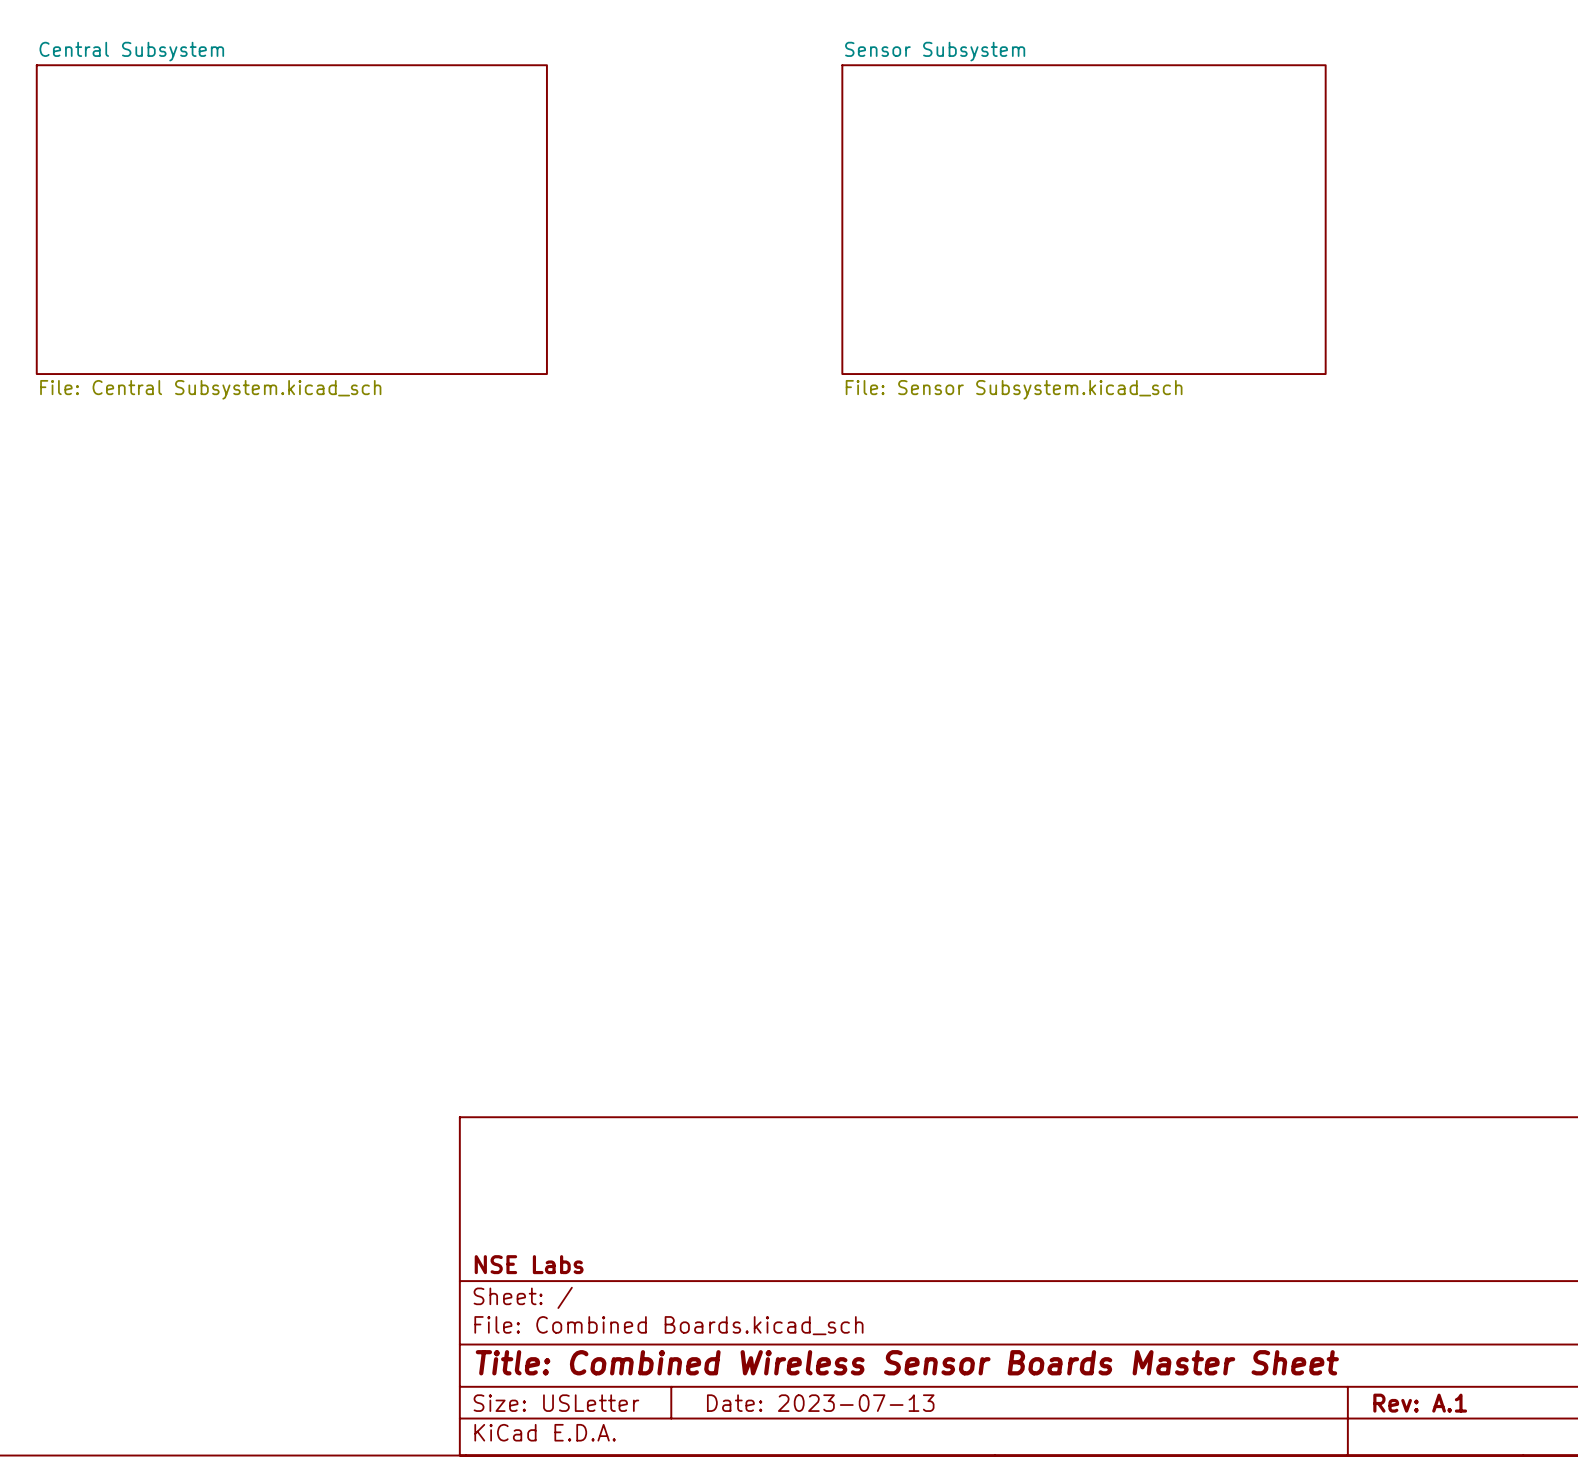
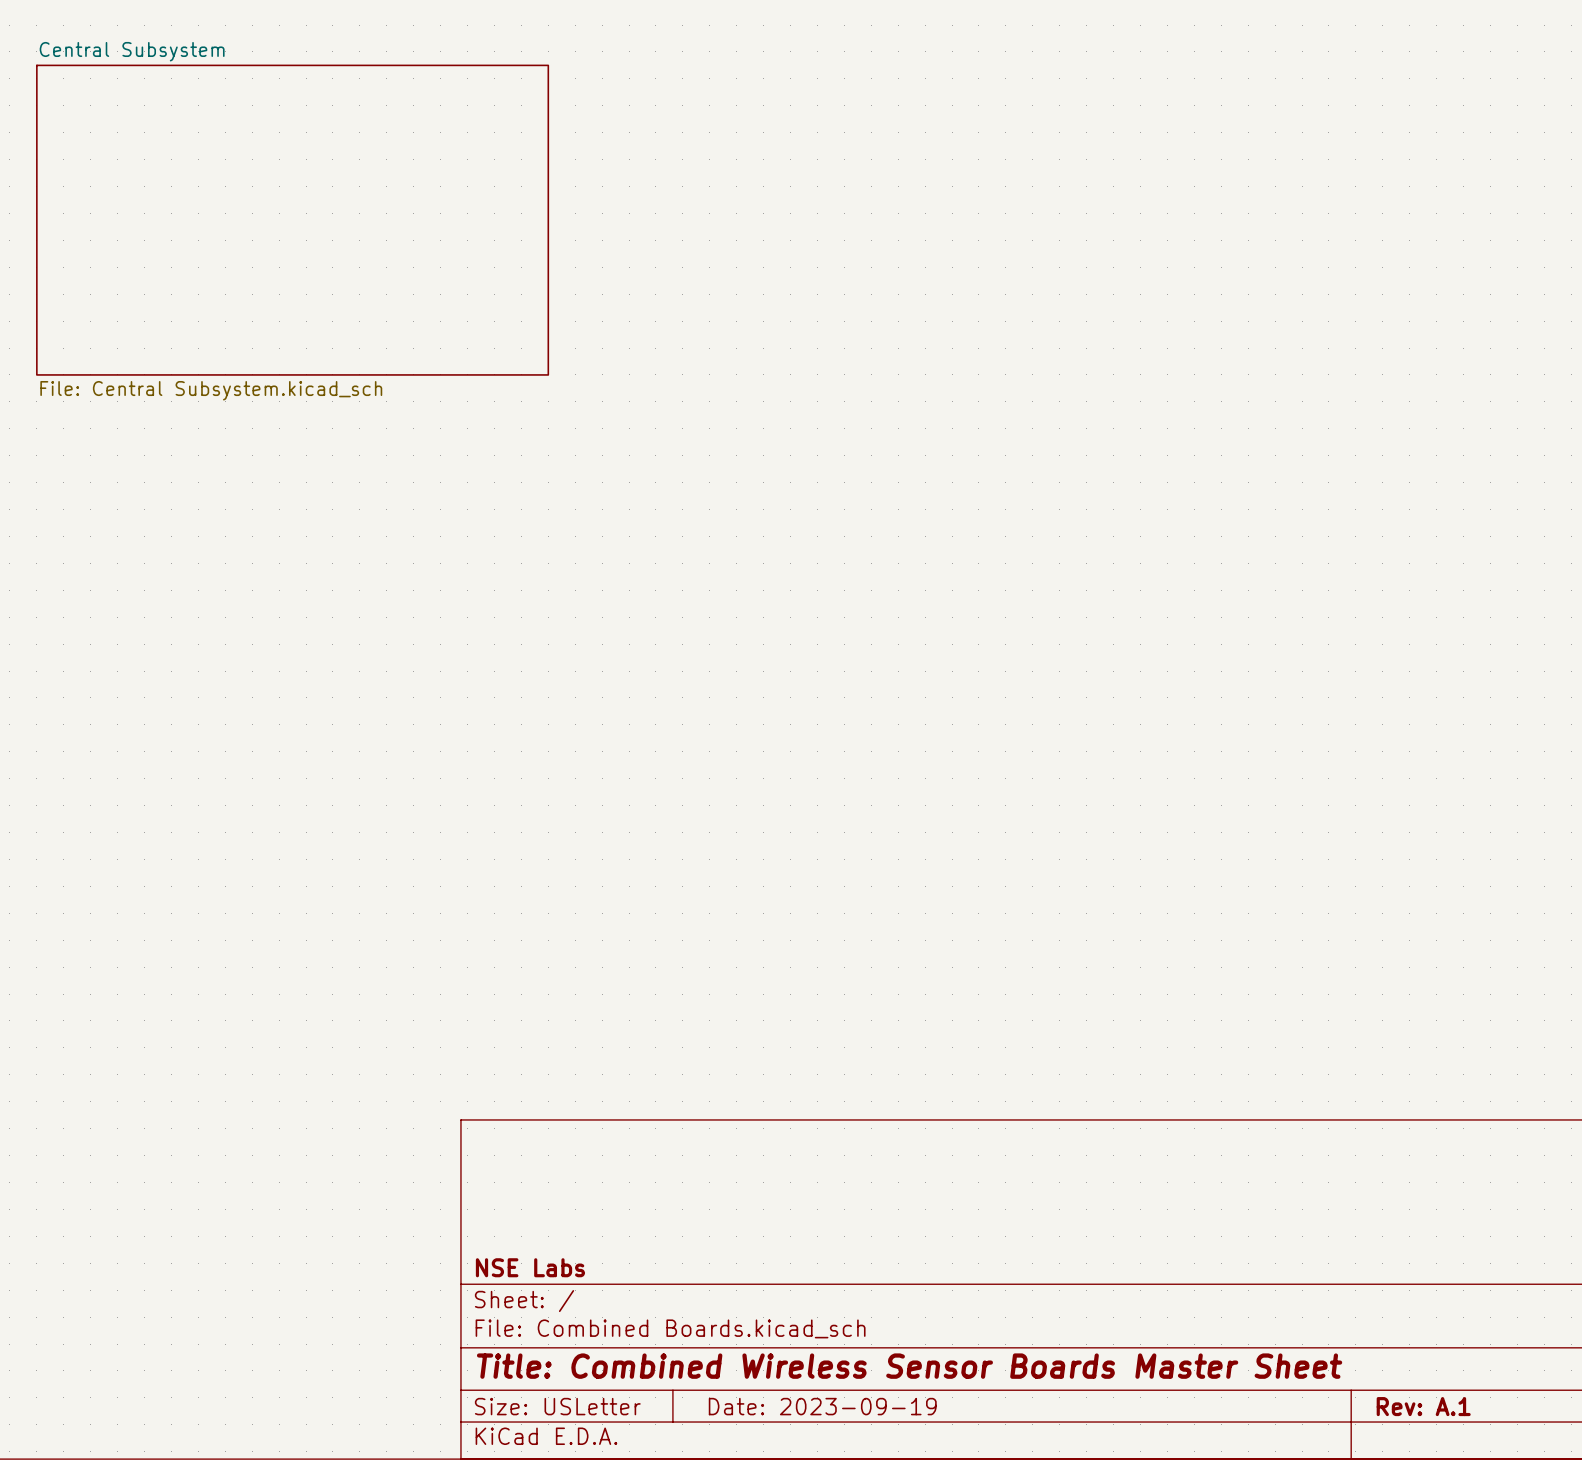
sheet Sensor Subsystem: File: Sensor Subsystem.kicad_sch (1084, 219) -> none
title block: Date: 2023-07-13 (820, 1403) -> Date: 2023-09-19 (822, 1406)

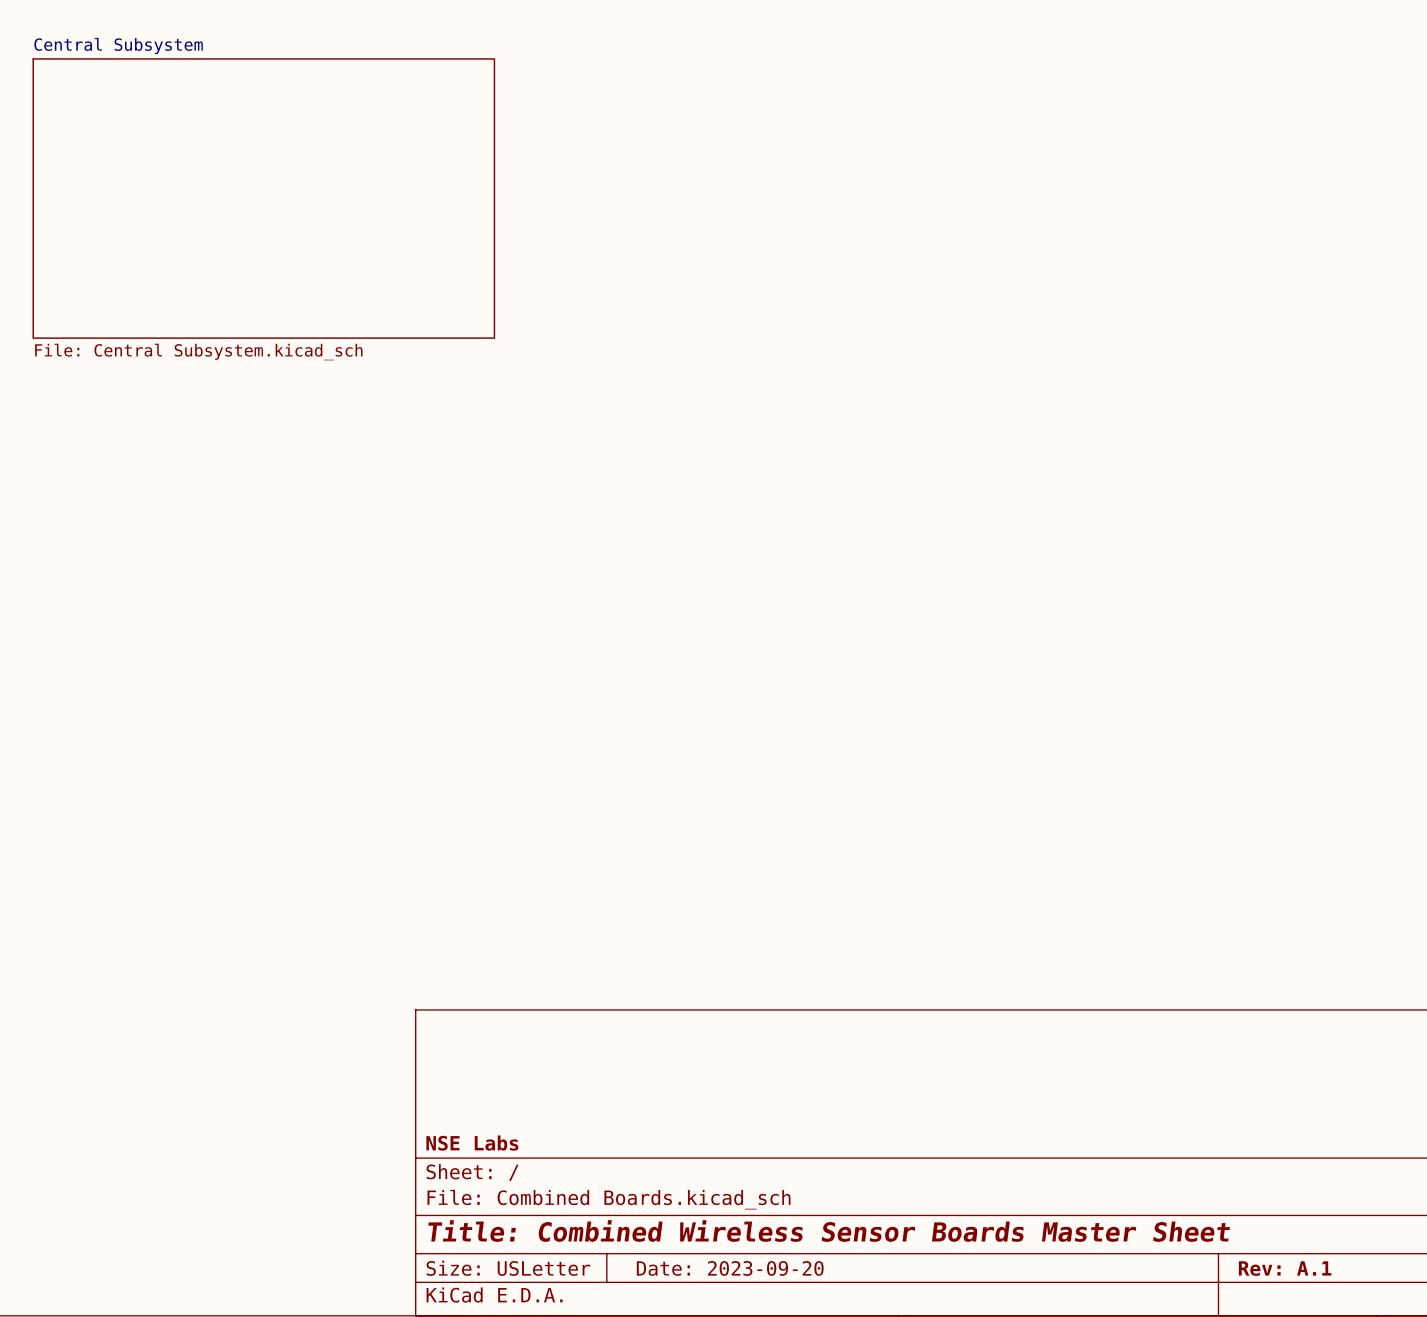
title block: Date: 2023-09-19 (822, 1406) -> Date: 2023-09-20 (730, 1268)

